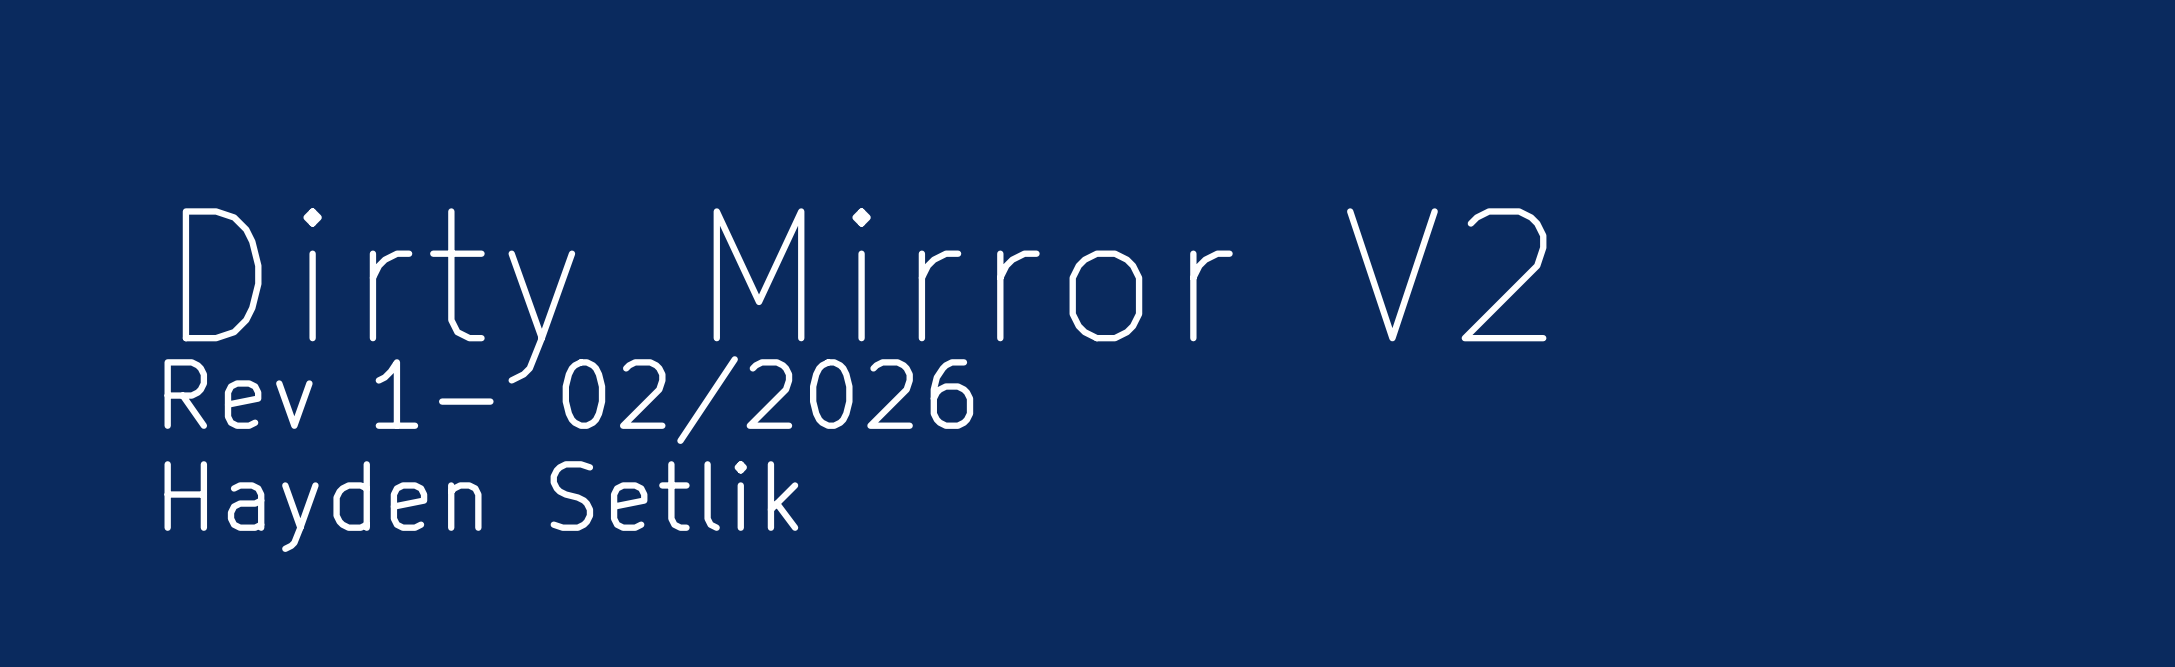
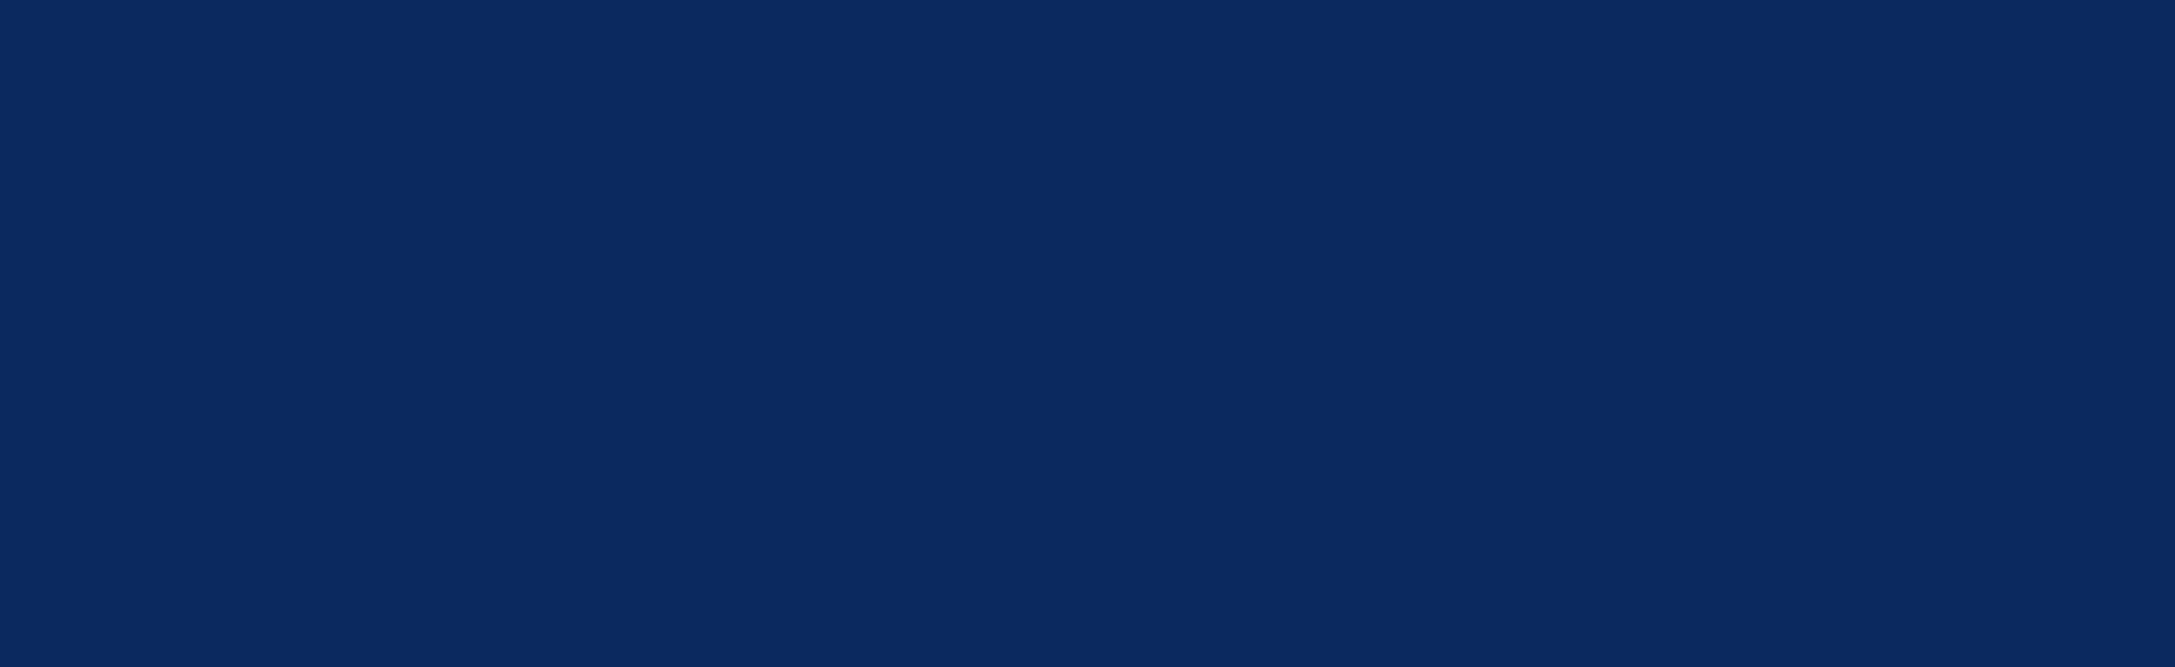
text: Dirty Mirror V2 (864, 295) -> none
text: Rev 1- 02/2026 (568, 400) -> none
text: Hayden Setlik (481, 506) -> none

